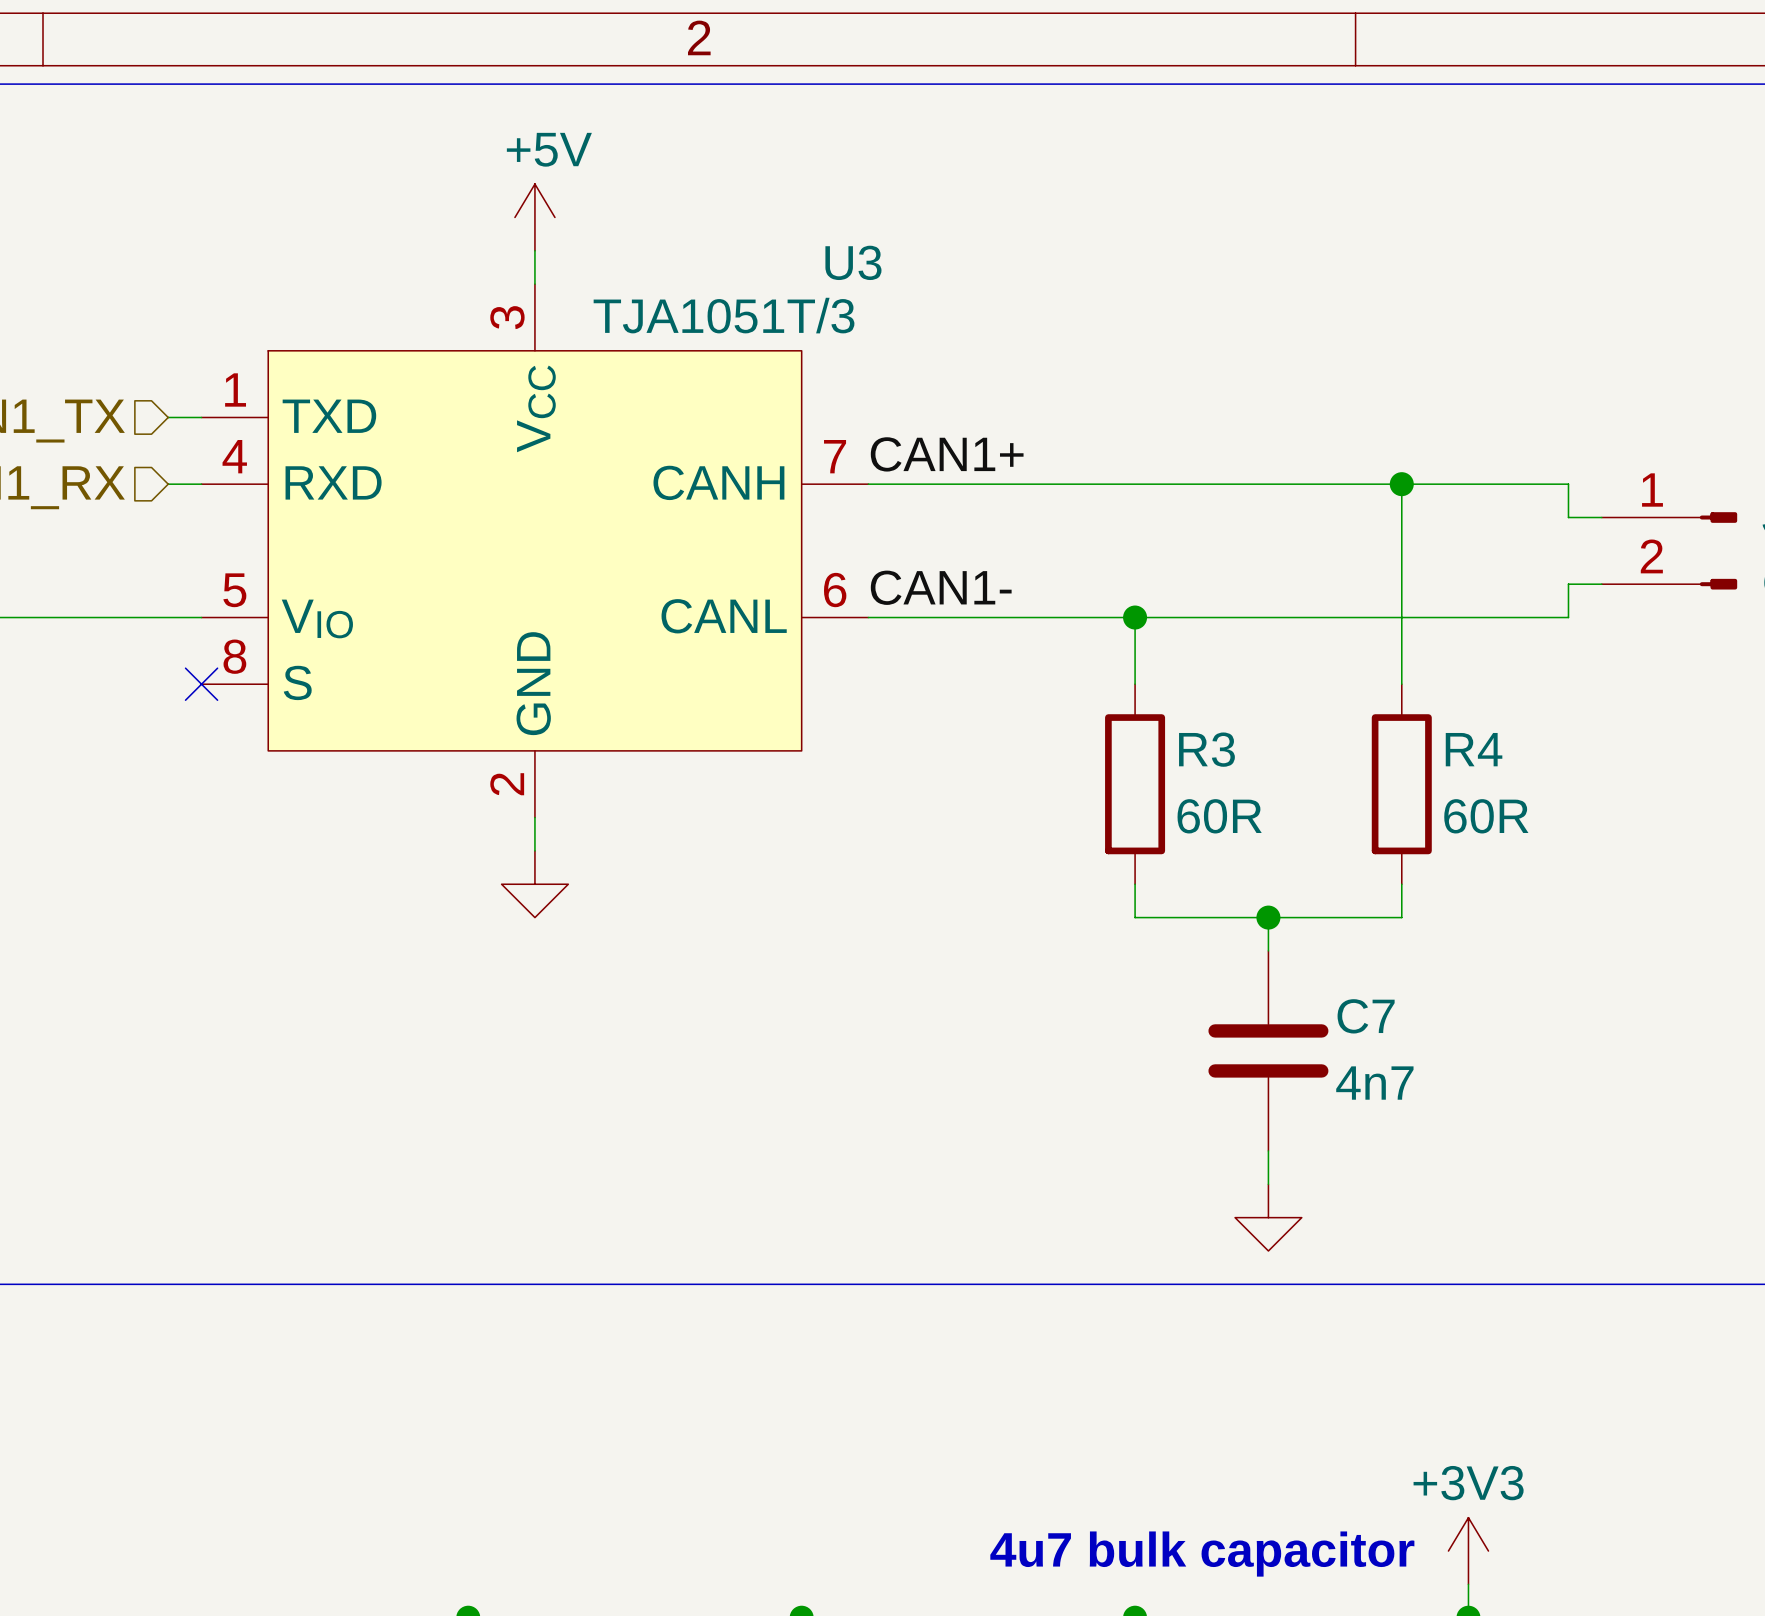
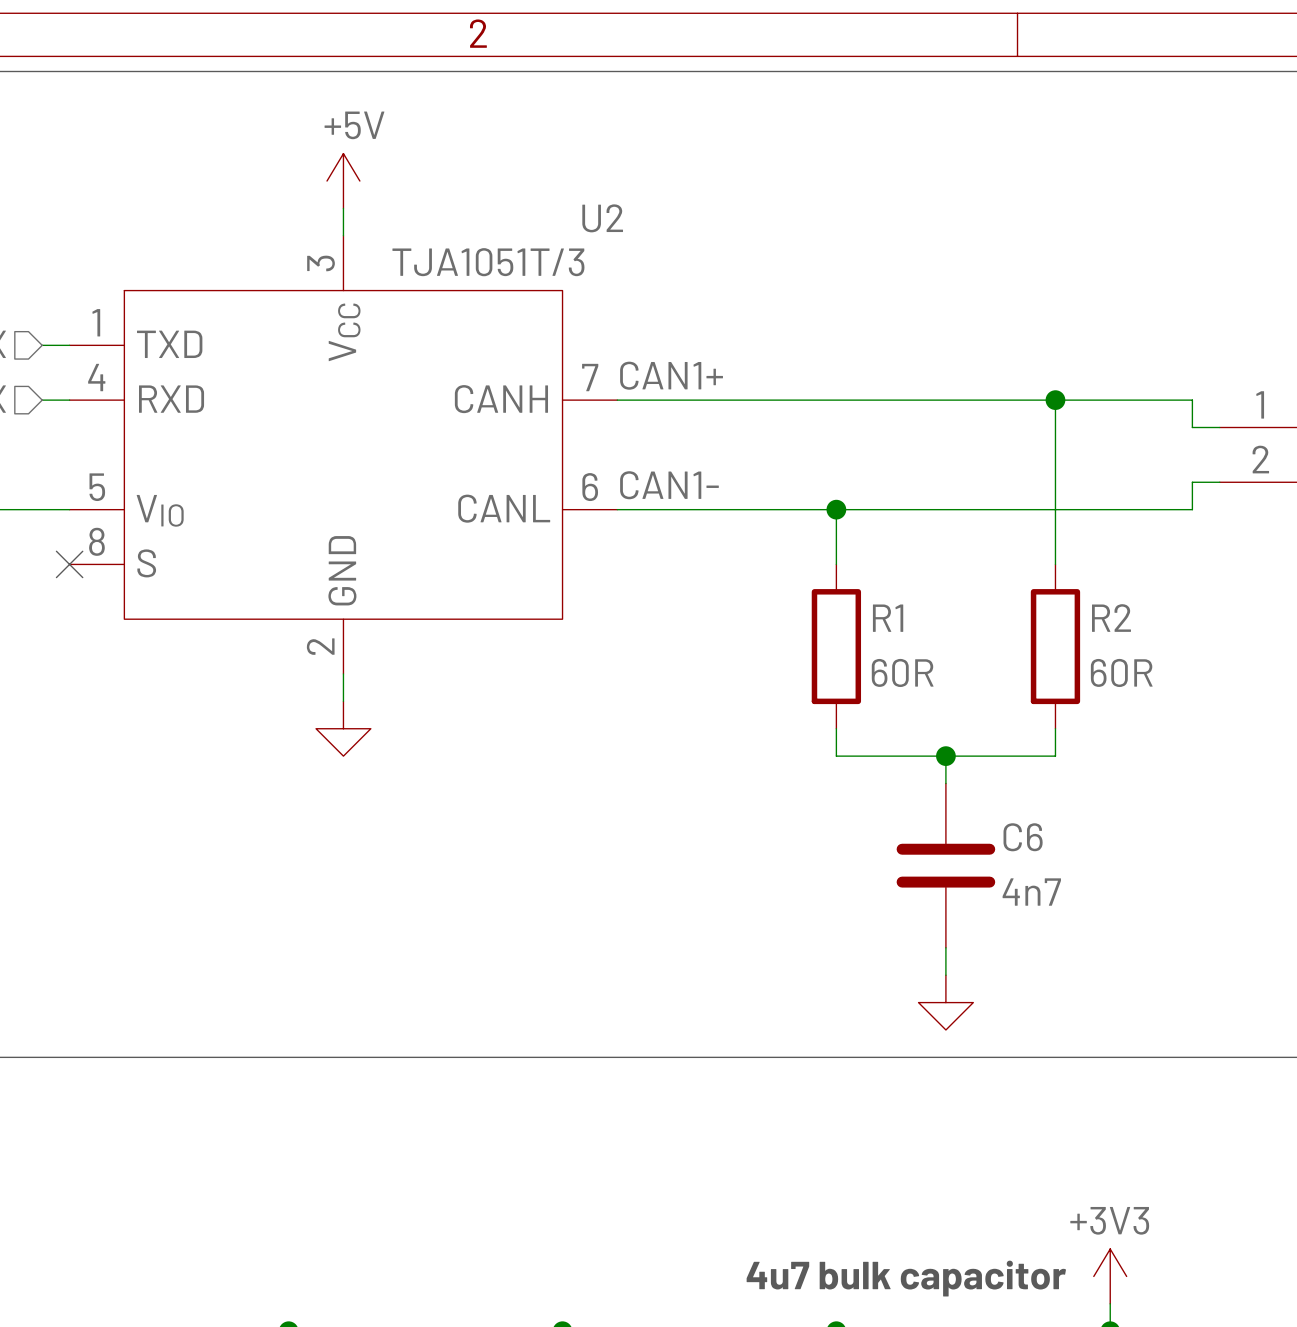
U3 name: U3 (853, 262) -> U2 (602, 218)
R3 name: R3 (1206, 749) -> R1 (888, 618)
R4 name: R4 (1474, 749) -> R2 (1111, 618)
C7 name: C7 (1366, 1016) -> C6 (1023, 837)

